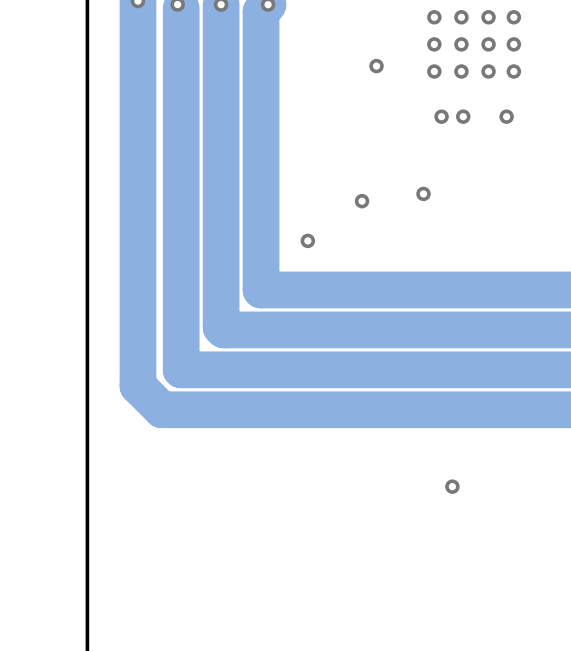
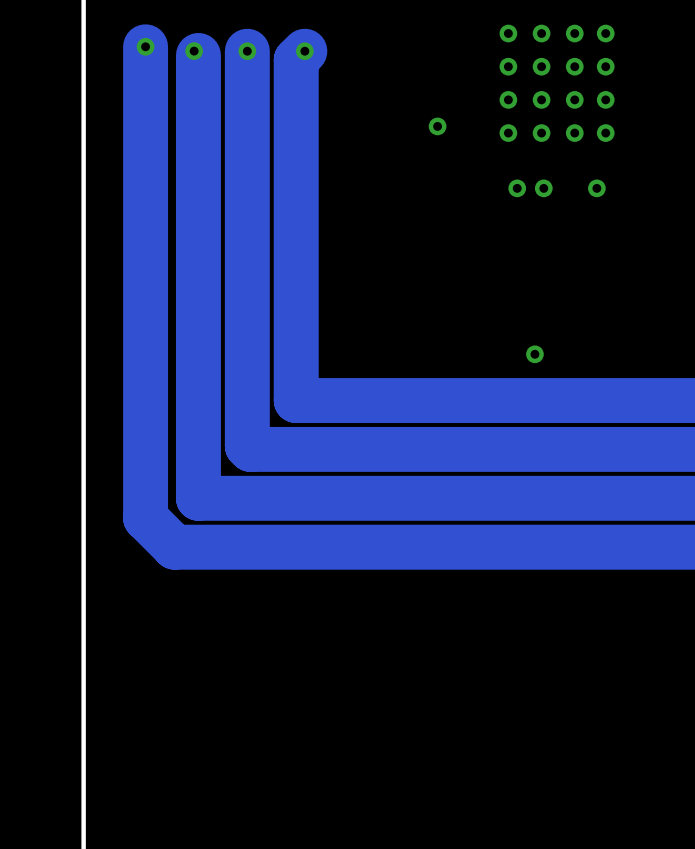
via: (423, 193) -> none
via: (362, 201) -> none
via: (307, 240) -> none
via: none -> (534, 354)
via: (452, 486) -> none

